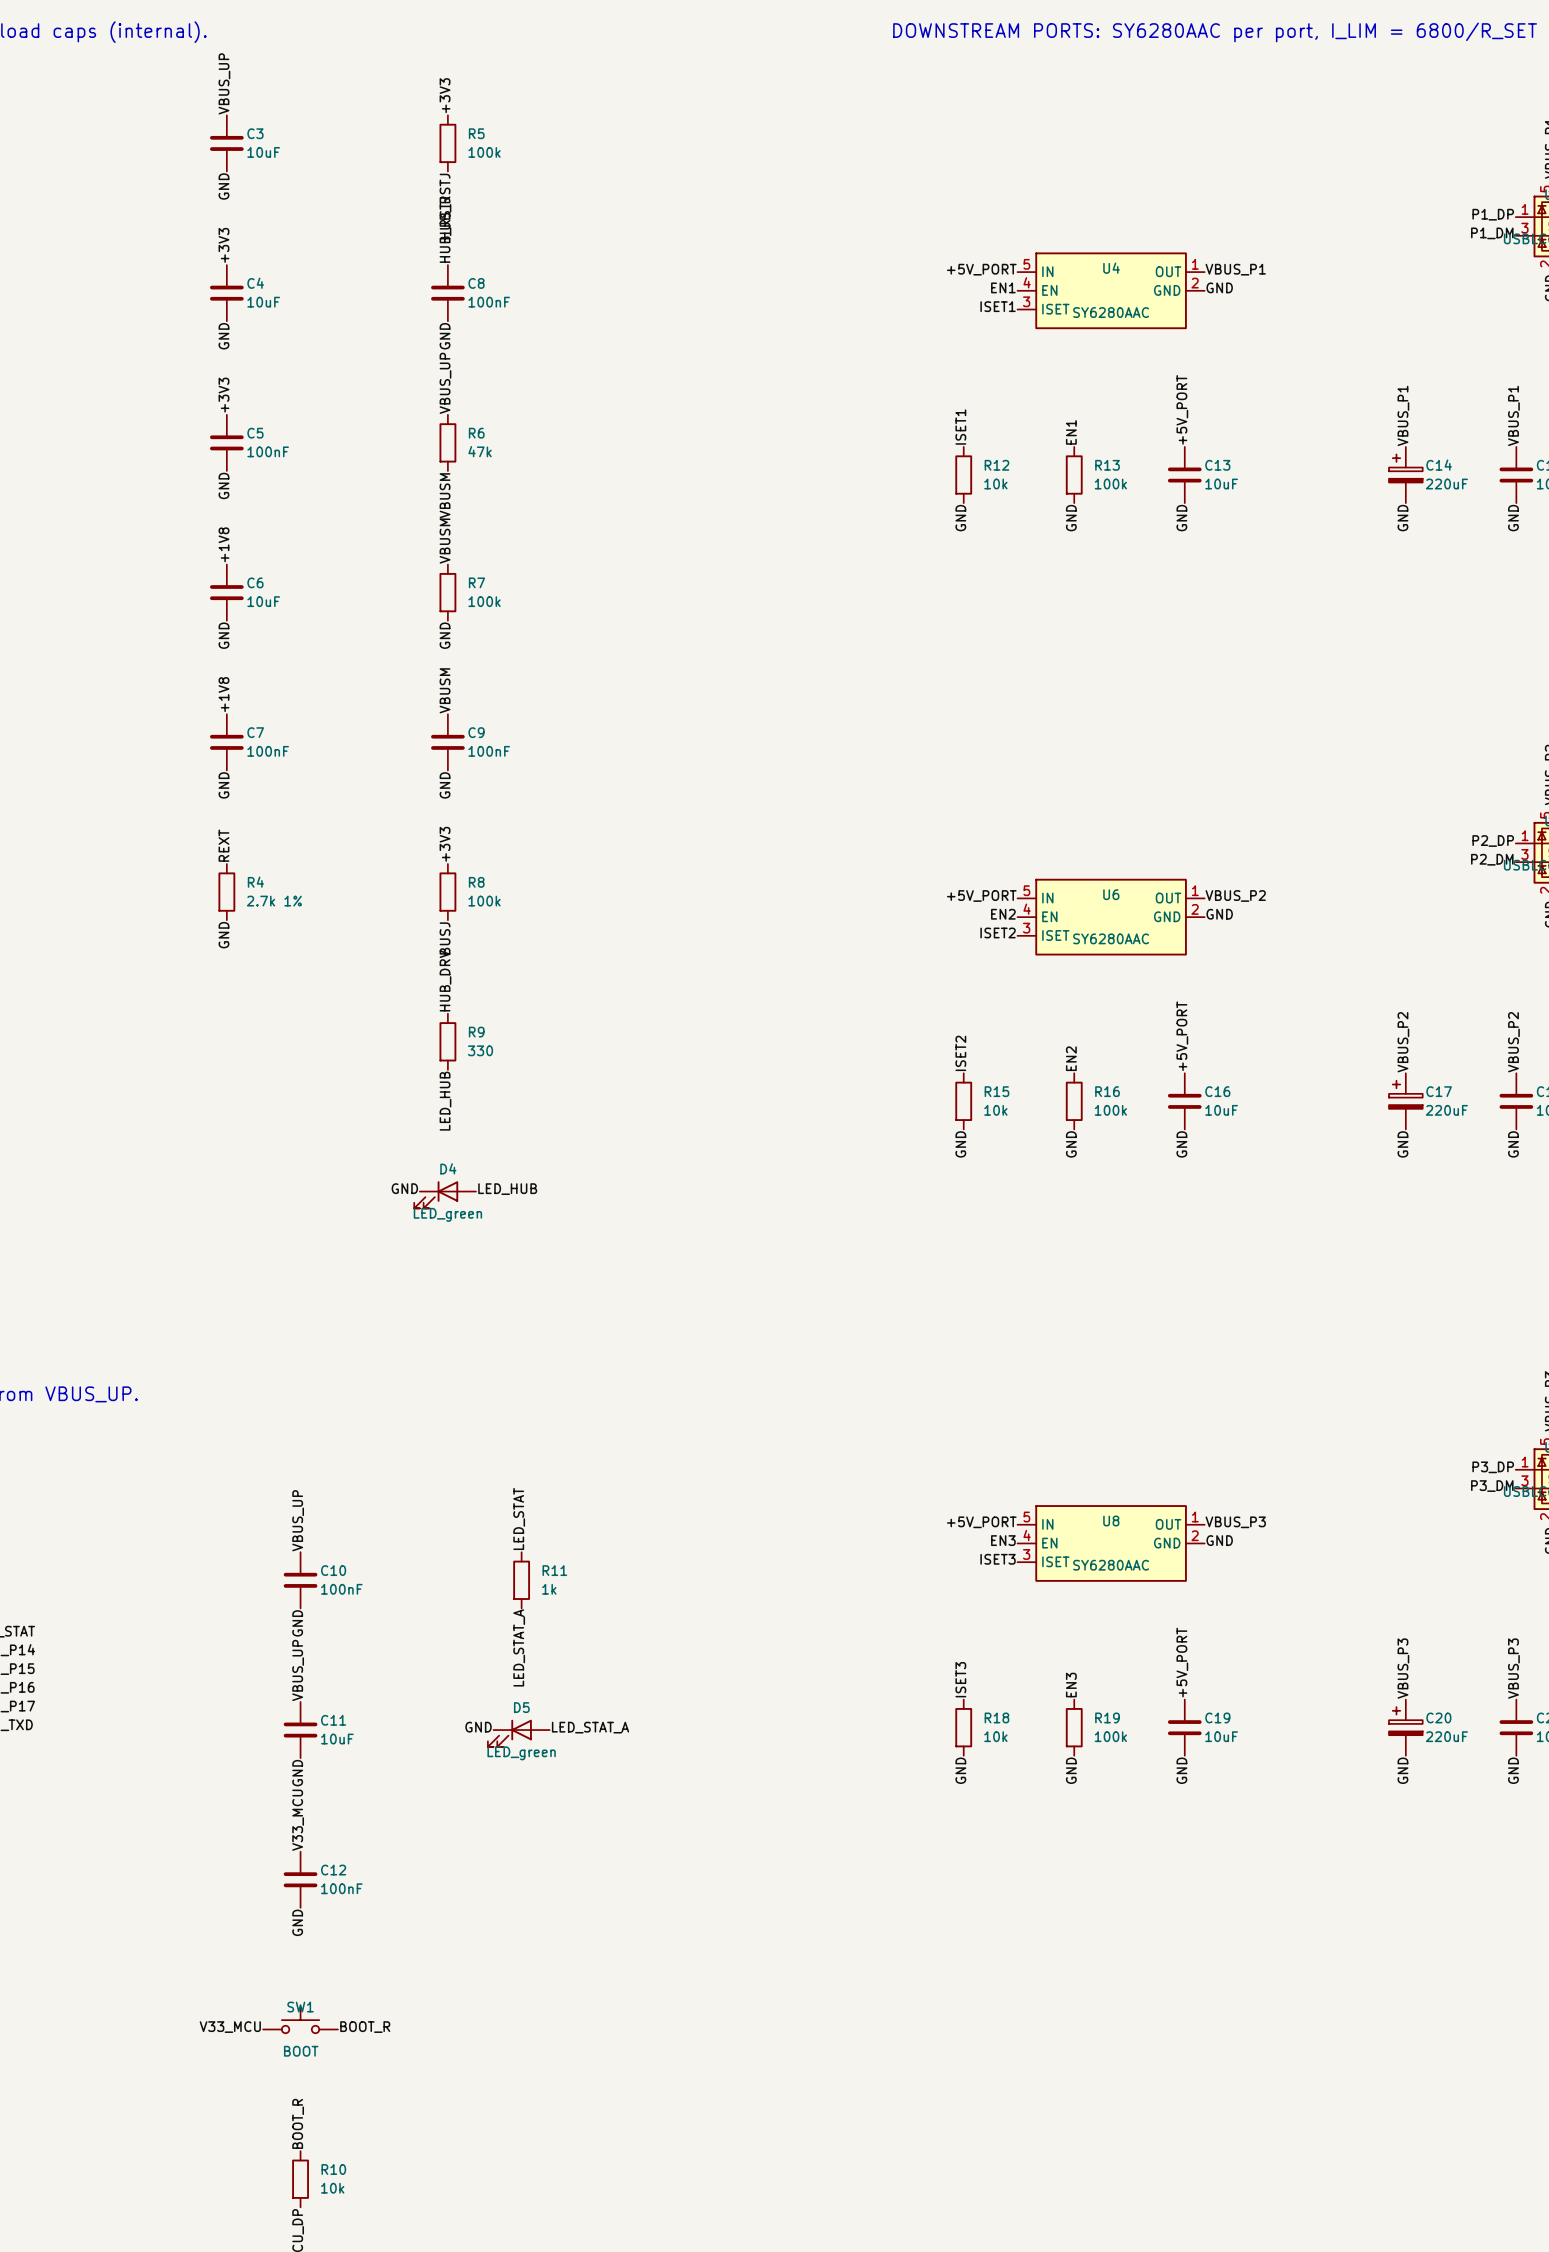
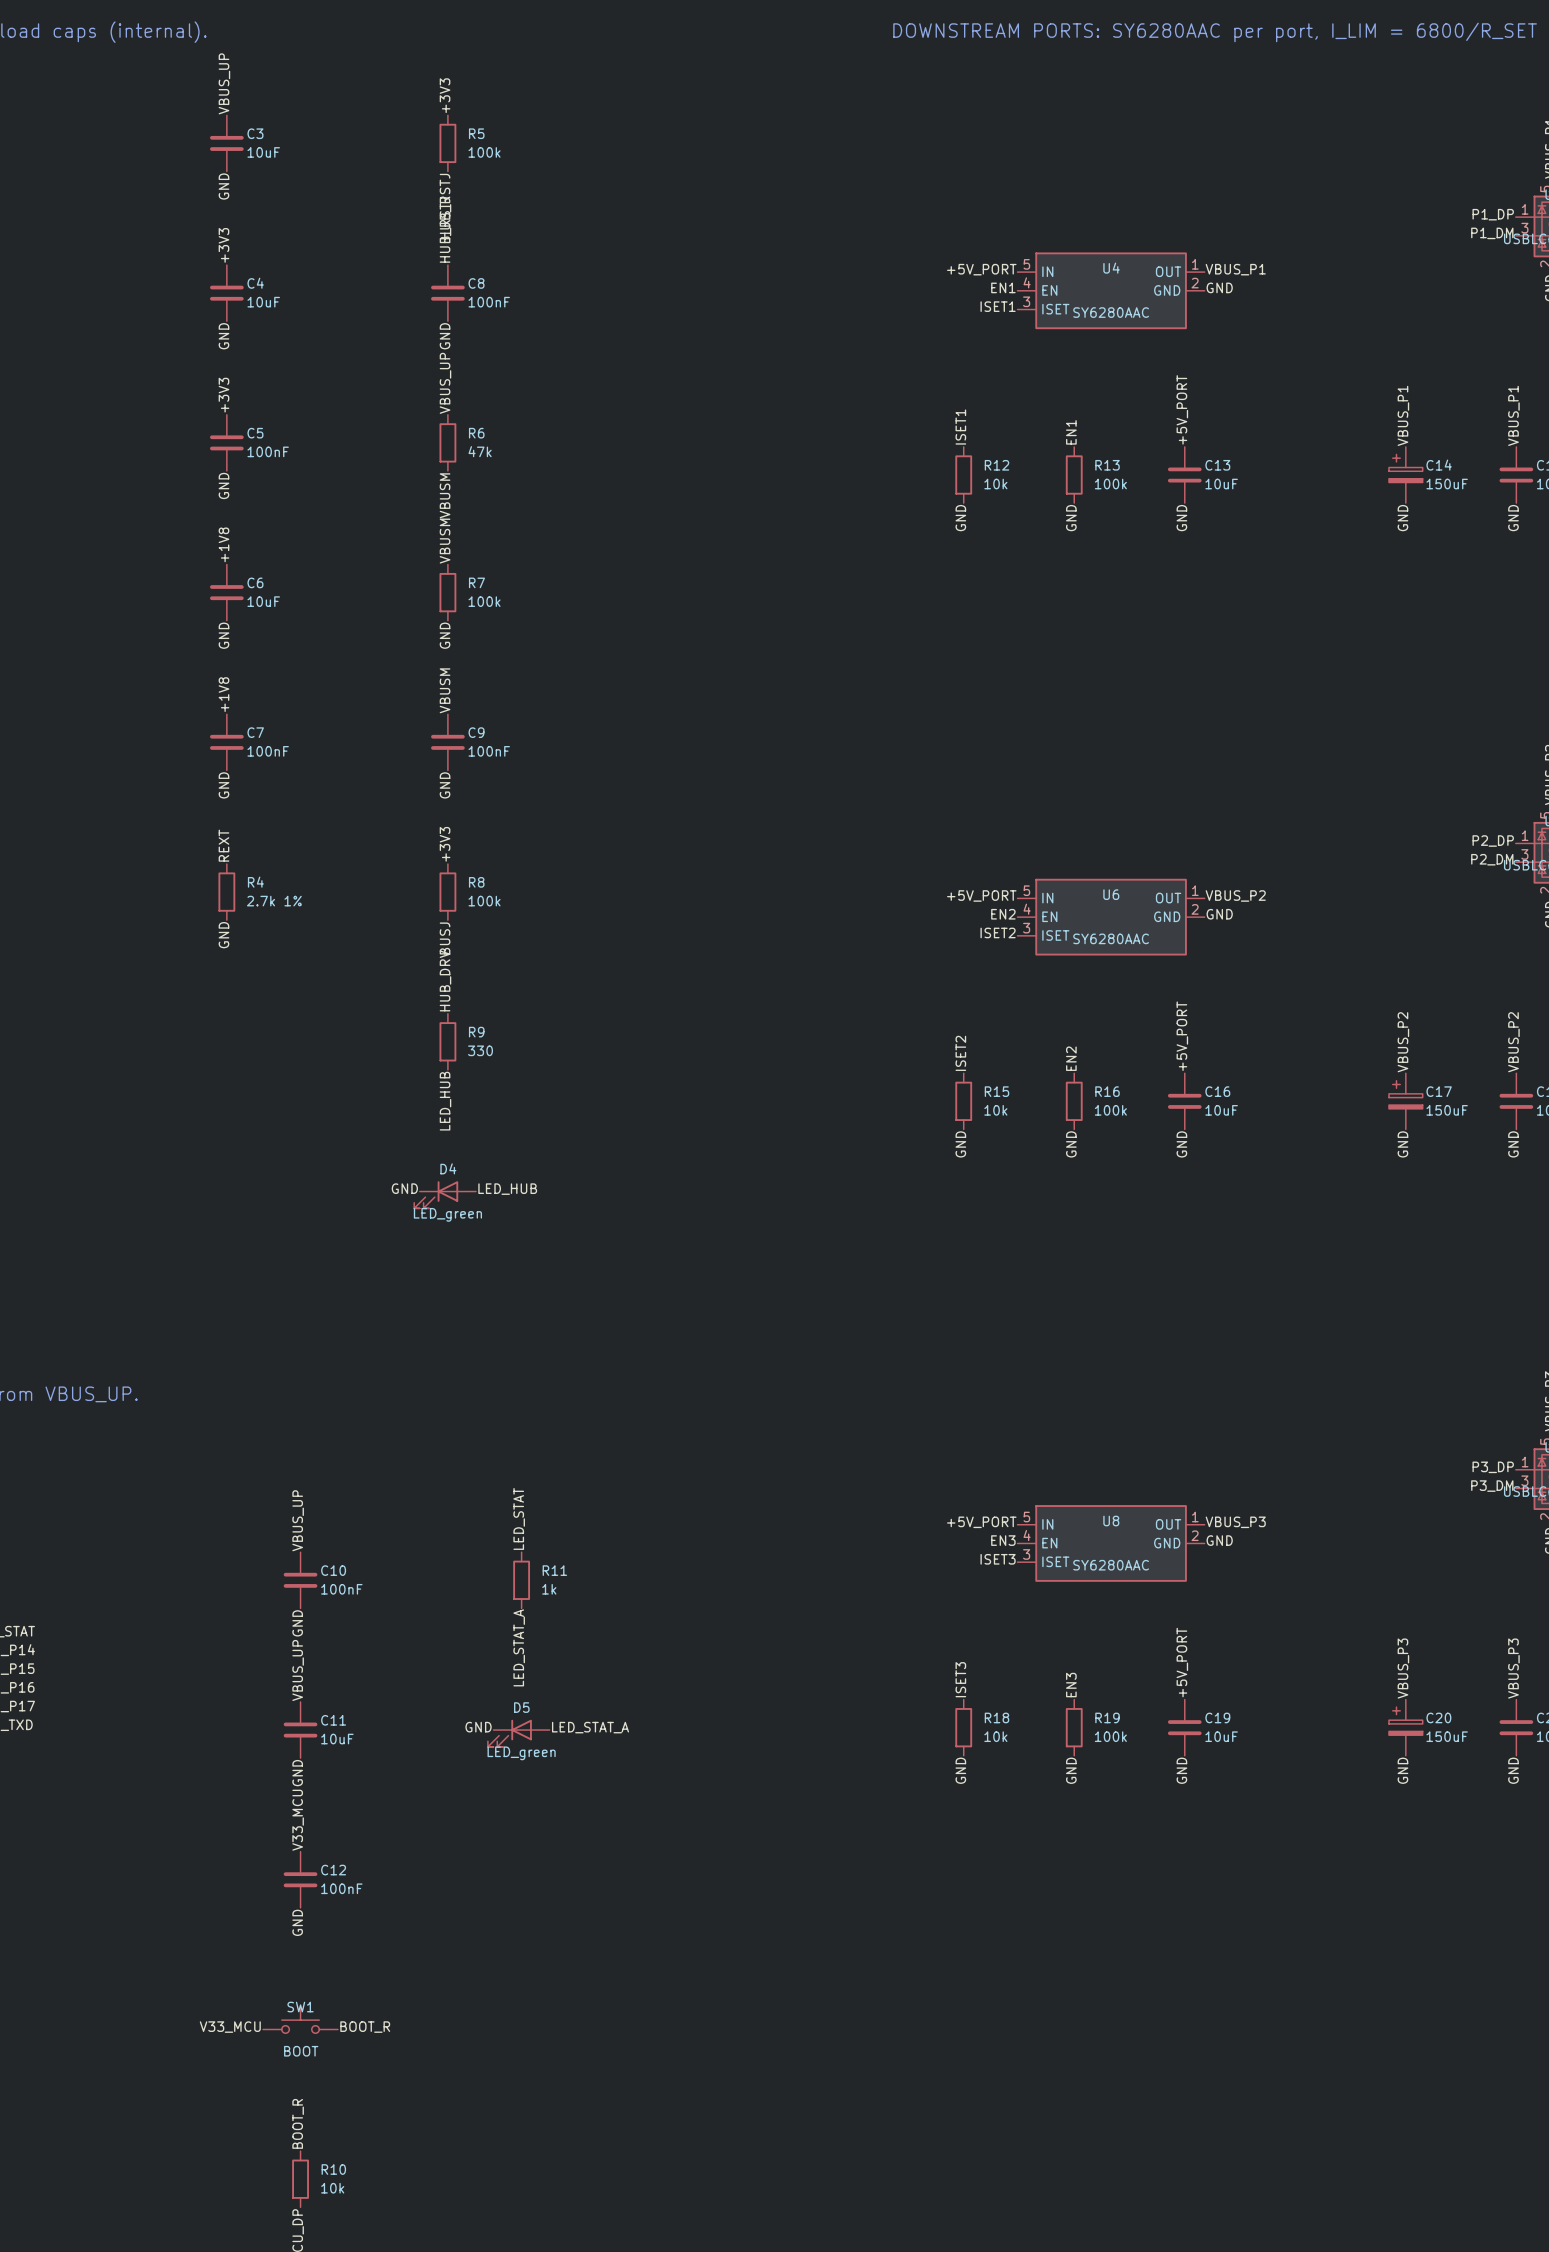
C14 value: 220uF (1446, 484) -> 150uF (1447, 484)
C17 value: 220uF (1446, 1110) -> 150uF (1447, 1110)
C20 value: 220uF (1446, 1736) -> 150uF (1447, 1736)

